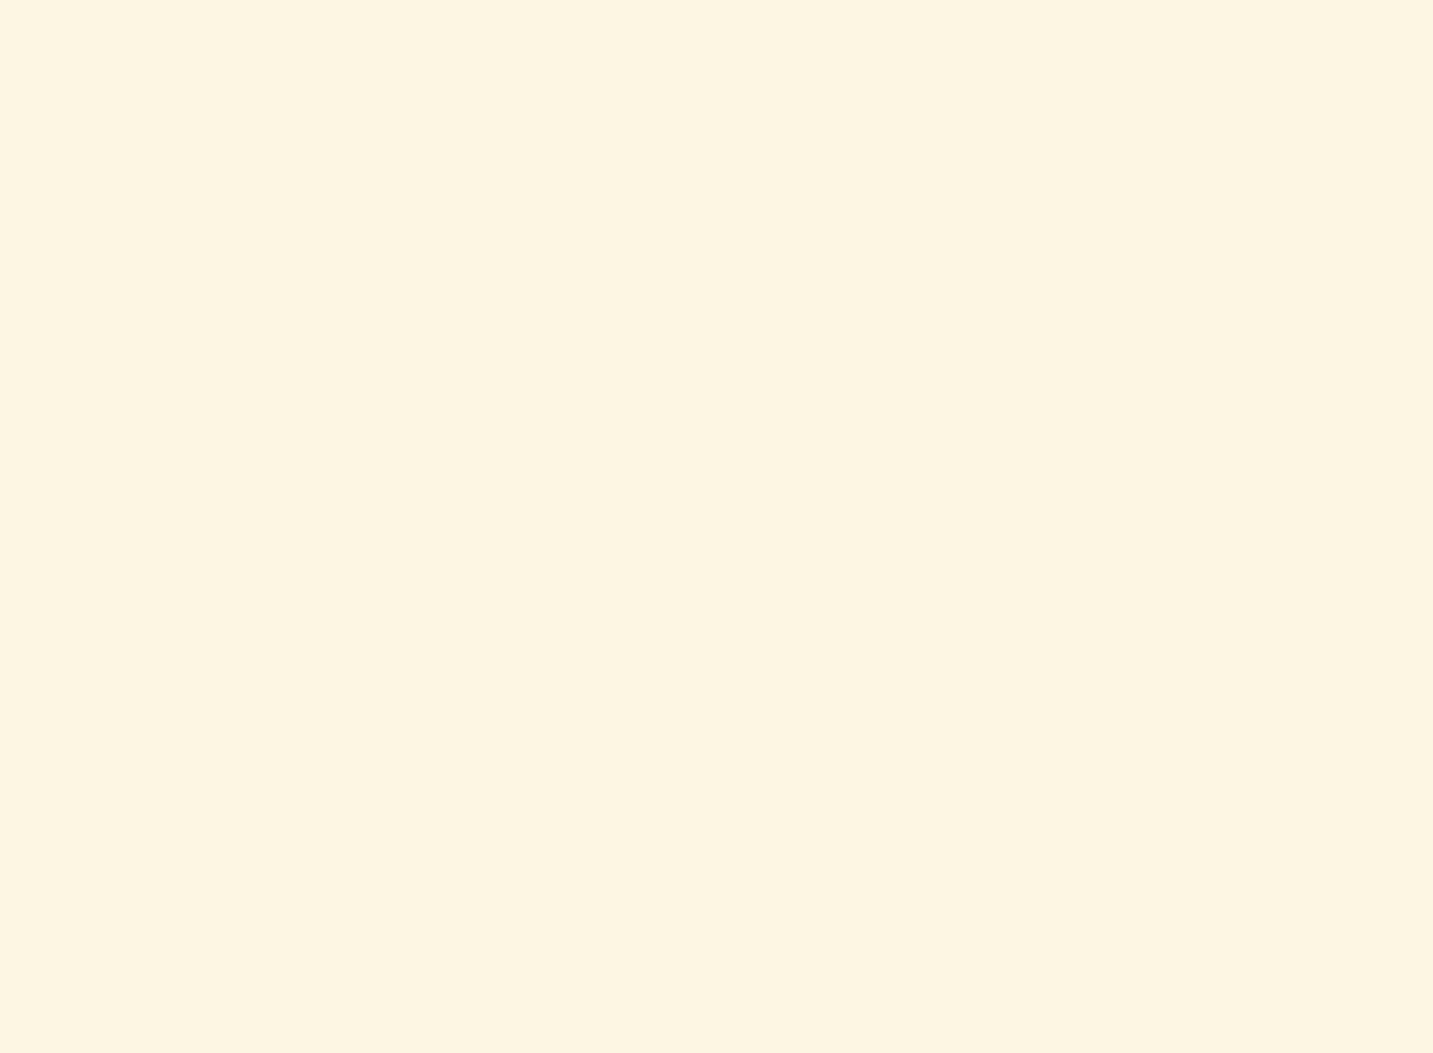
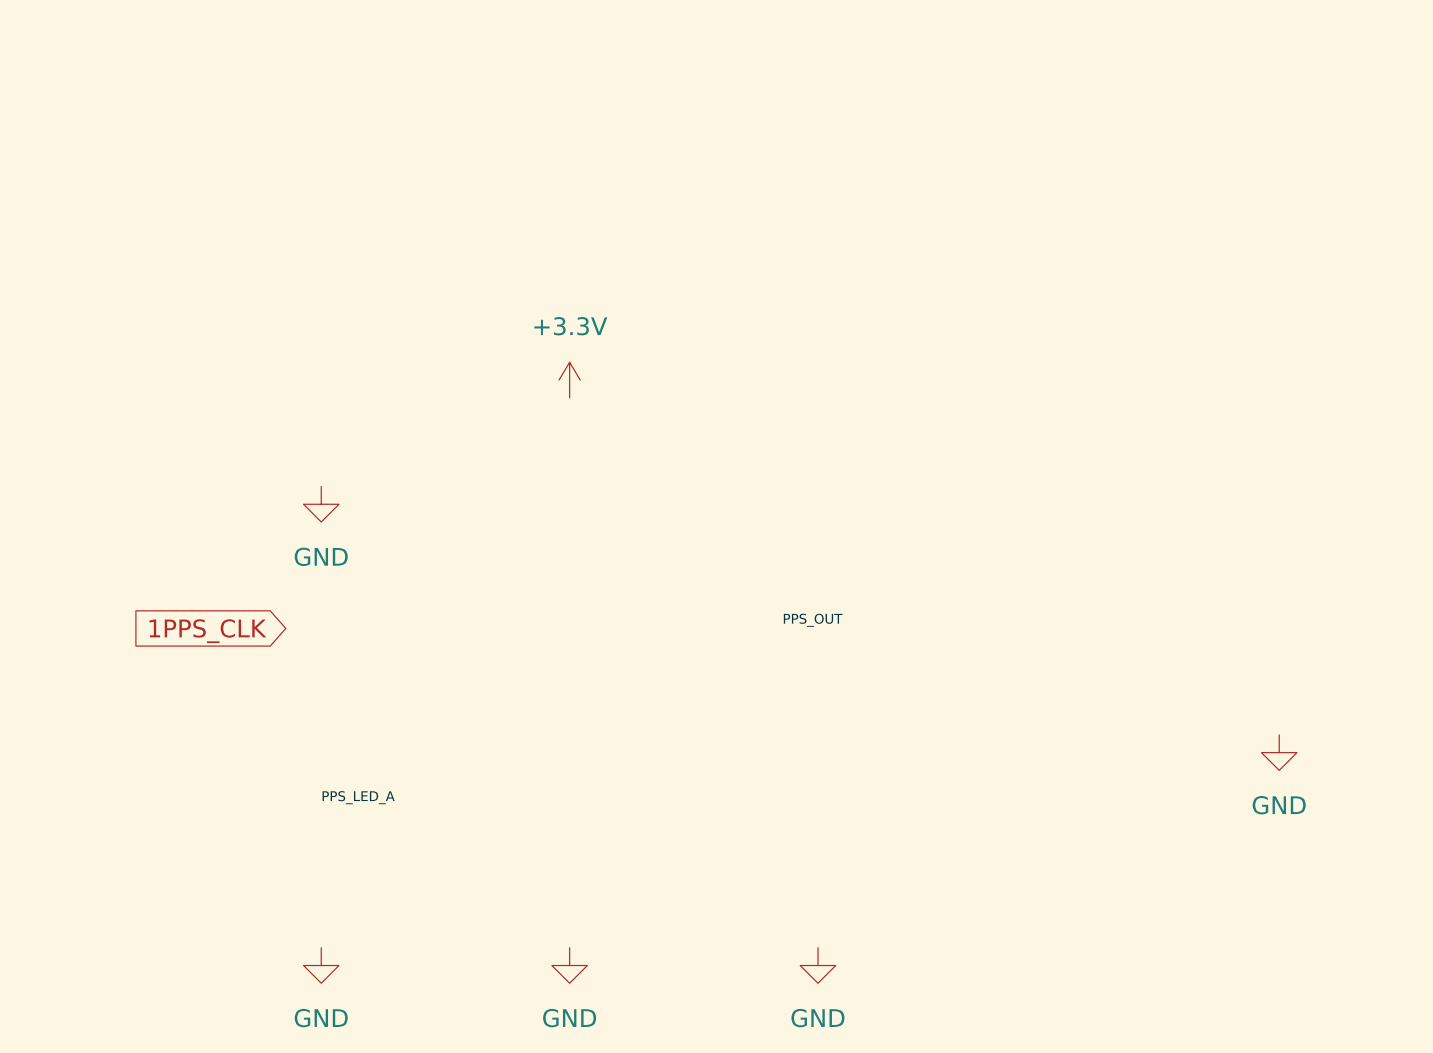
power symbol: none -> +3.3V (569, 380)
power symbol: none -> GND (321, 504)
label: none -> PPS_OUT (813, 620)
global label: none -> 1PPS_CLK (207, 631)
power symbol: none -> GND (1279, 752)
label: none -> PPS_LED_A (358, 797)
power symbol: none -> GND (321, 965)
power symbol: none -> GND (569, 965)
power symbol: none -> GND (817, 965)

